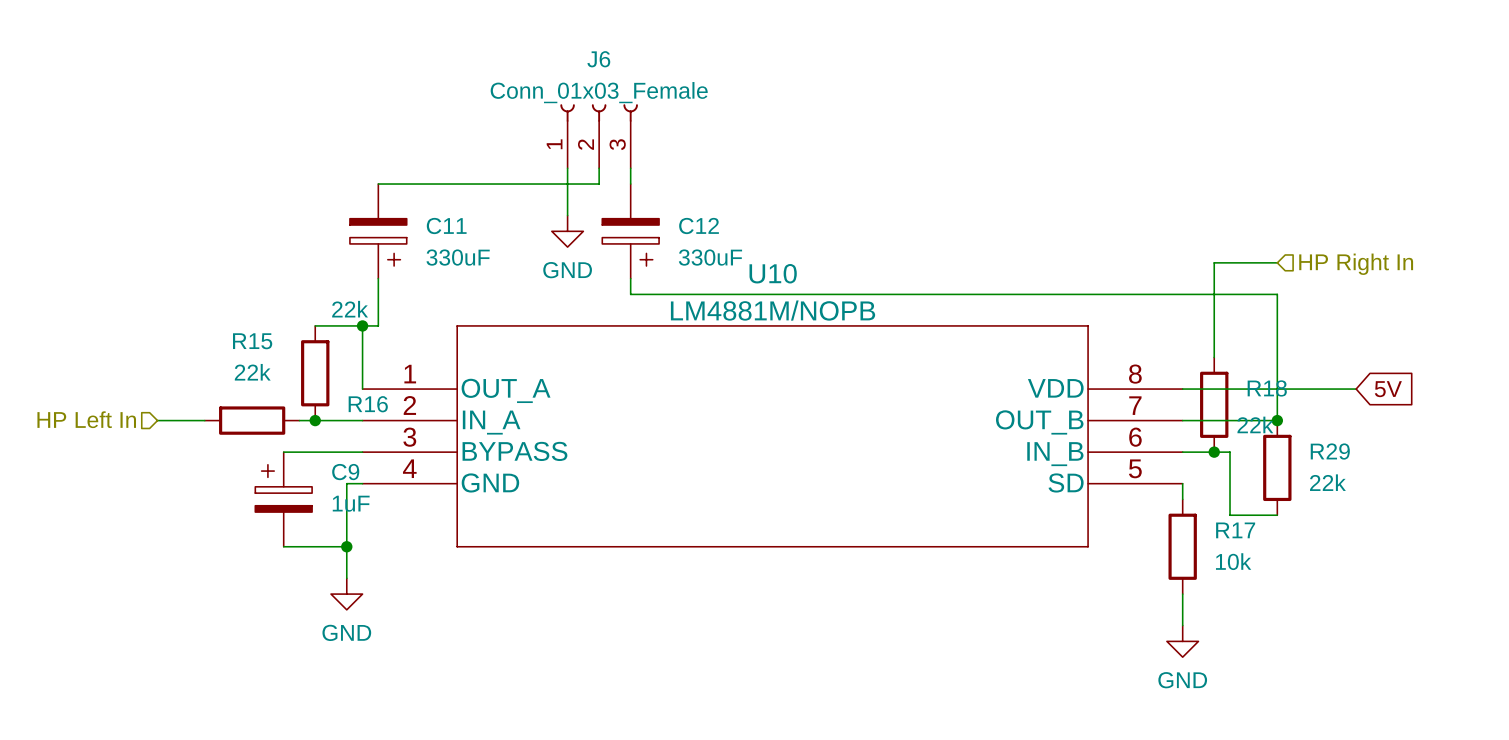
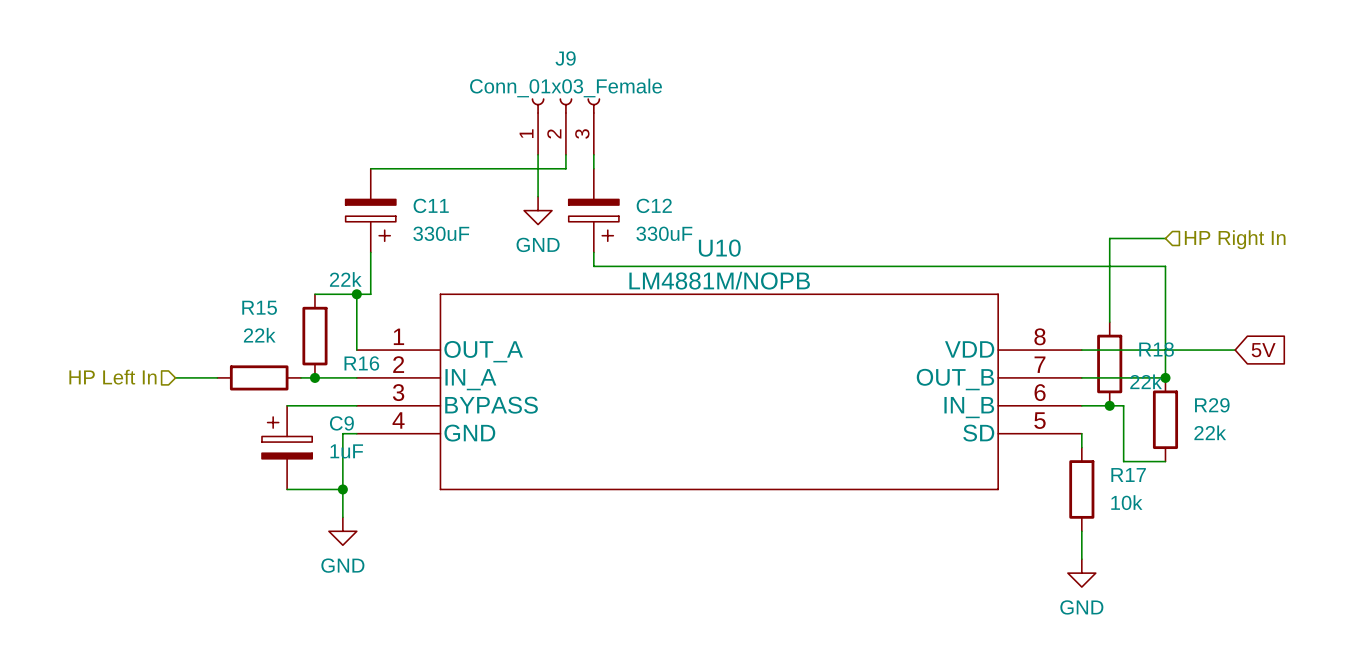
J6 name: J6 (598, 59) -> J9 (565, 58)

